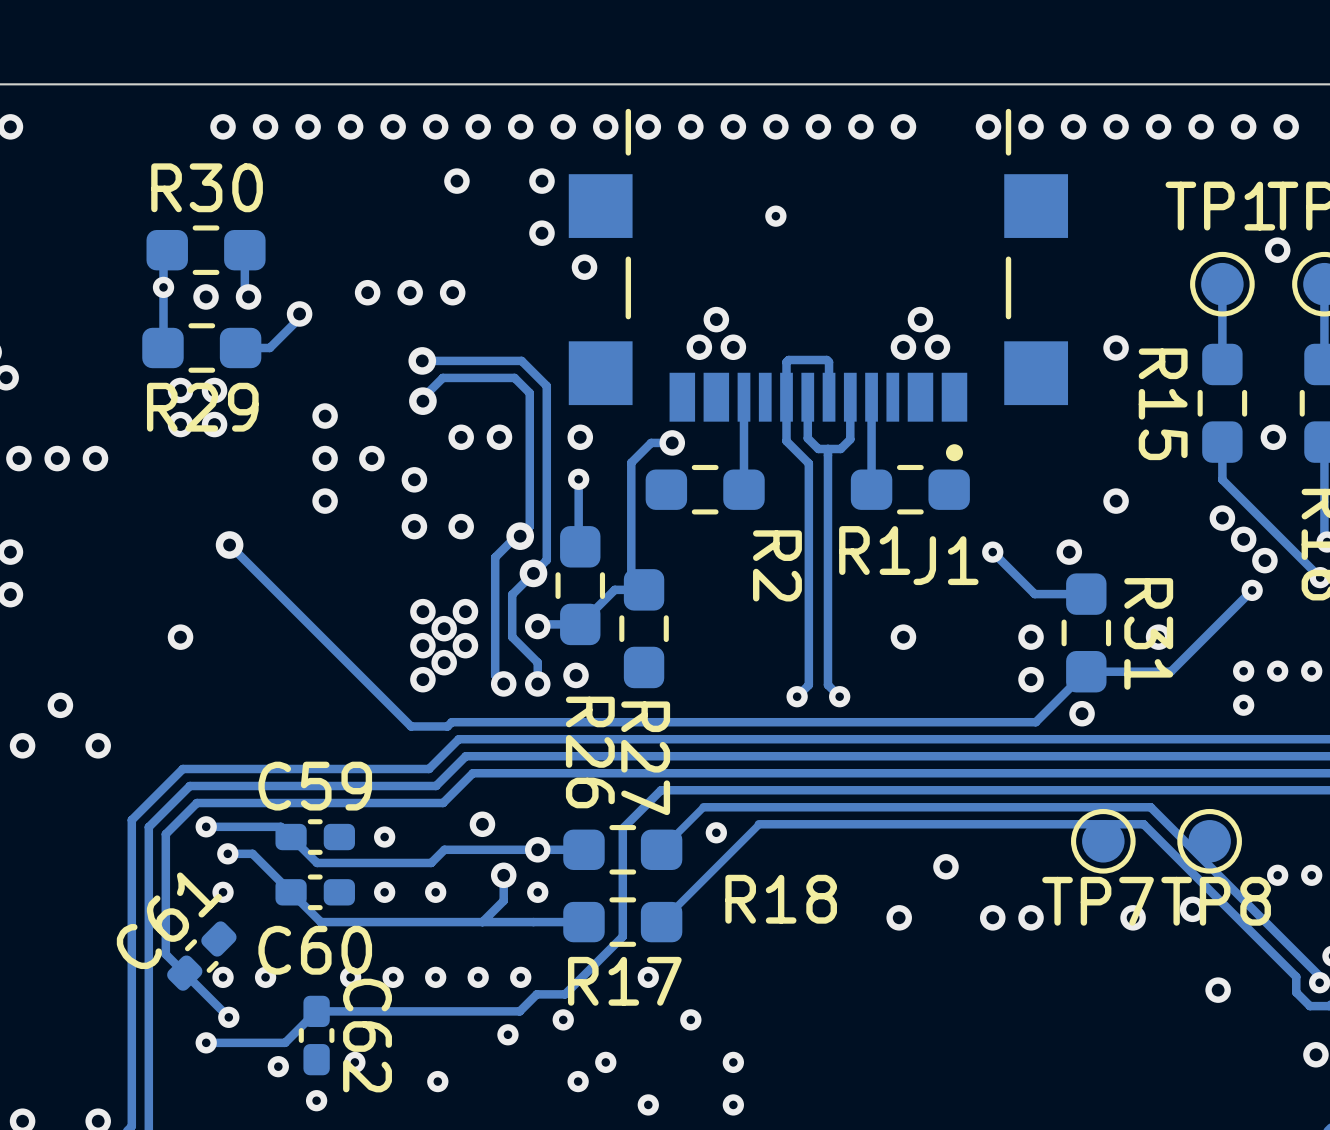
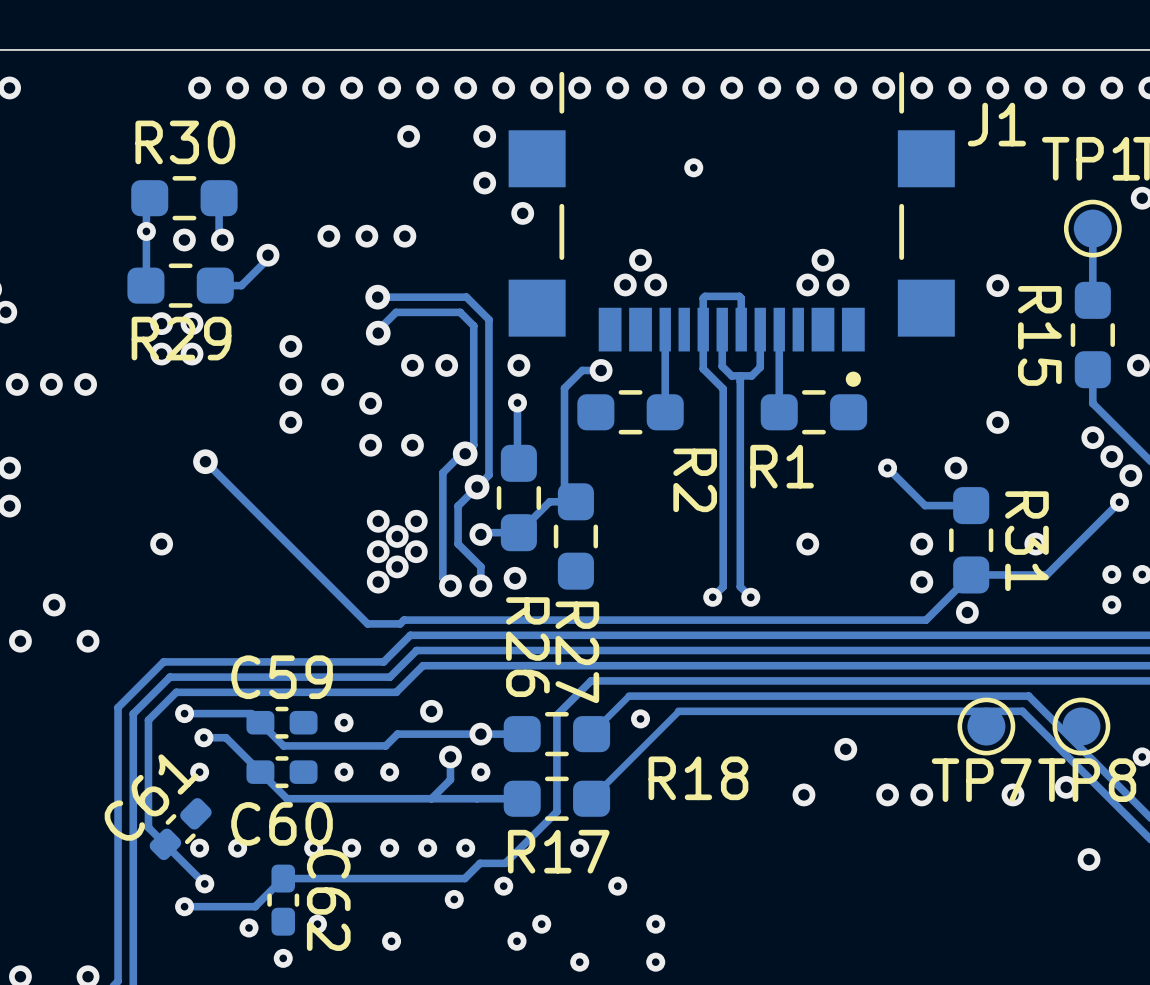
via: none -> (845, 87)
J1 name position: J1 (946, 560) -> J1 (996, 124)

